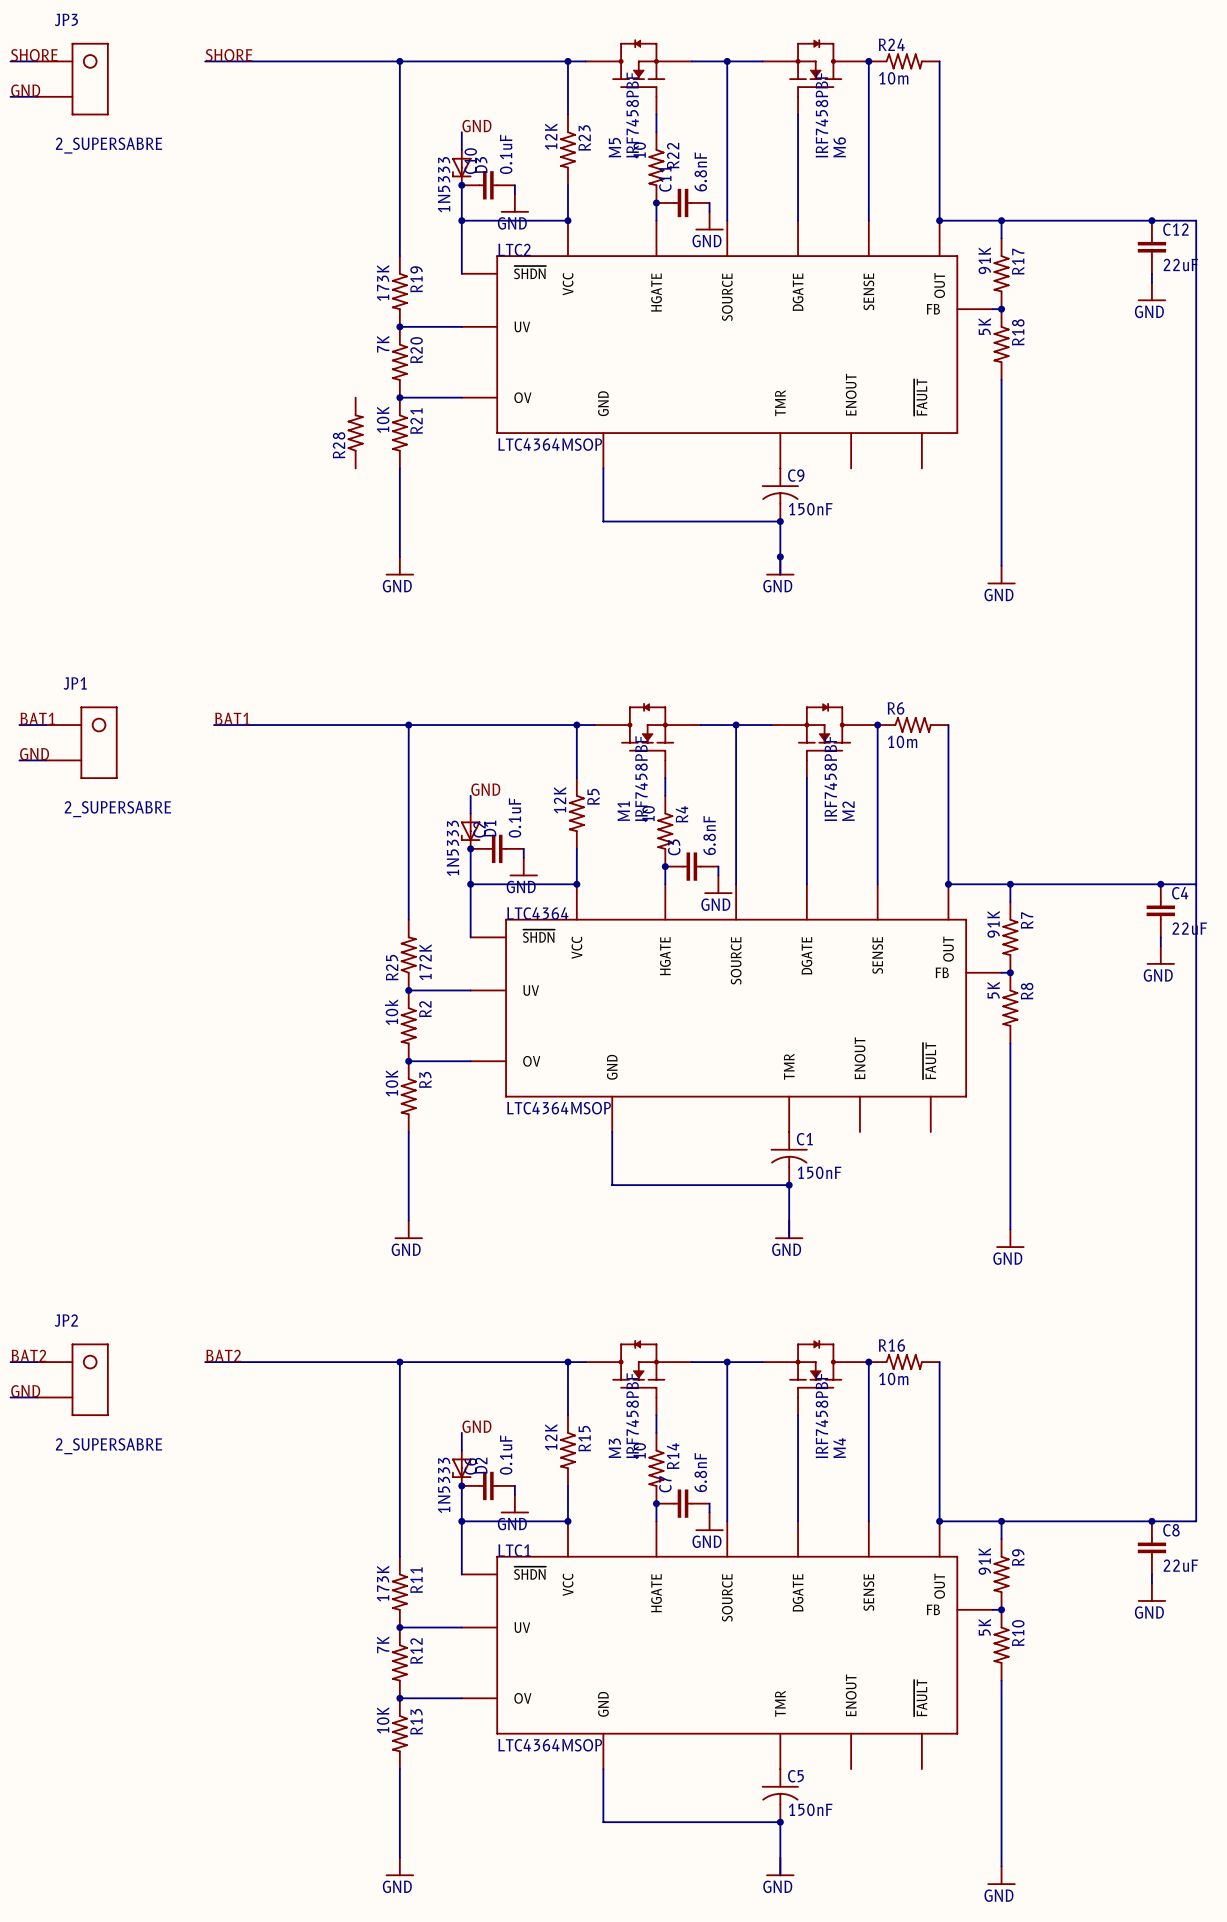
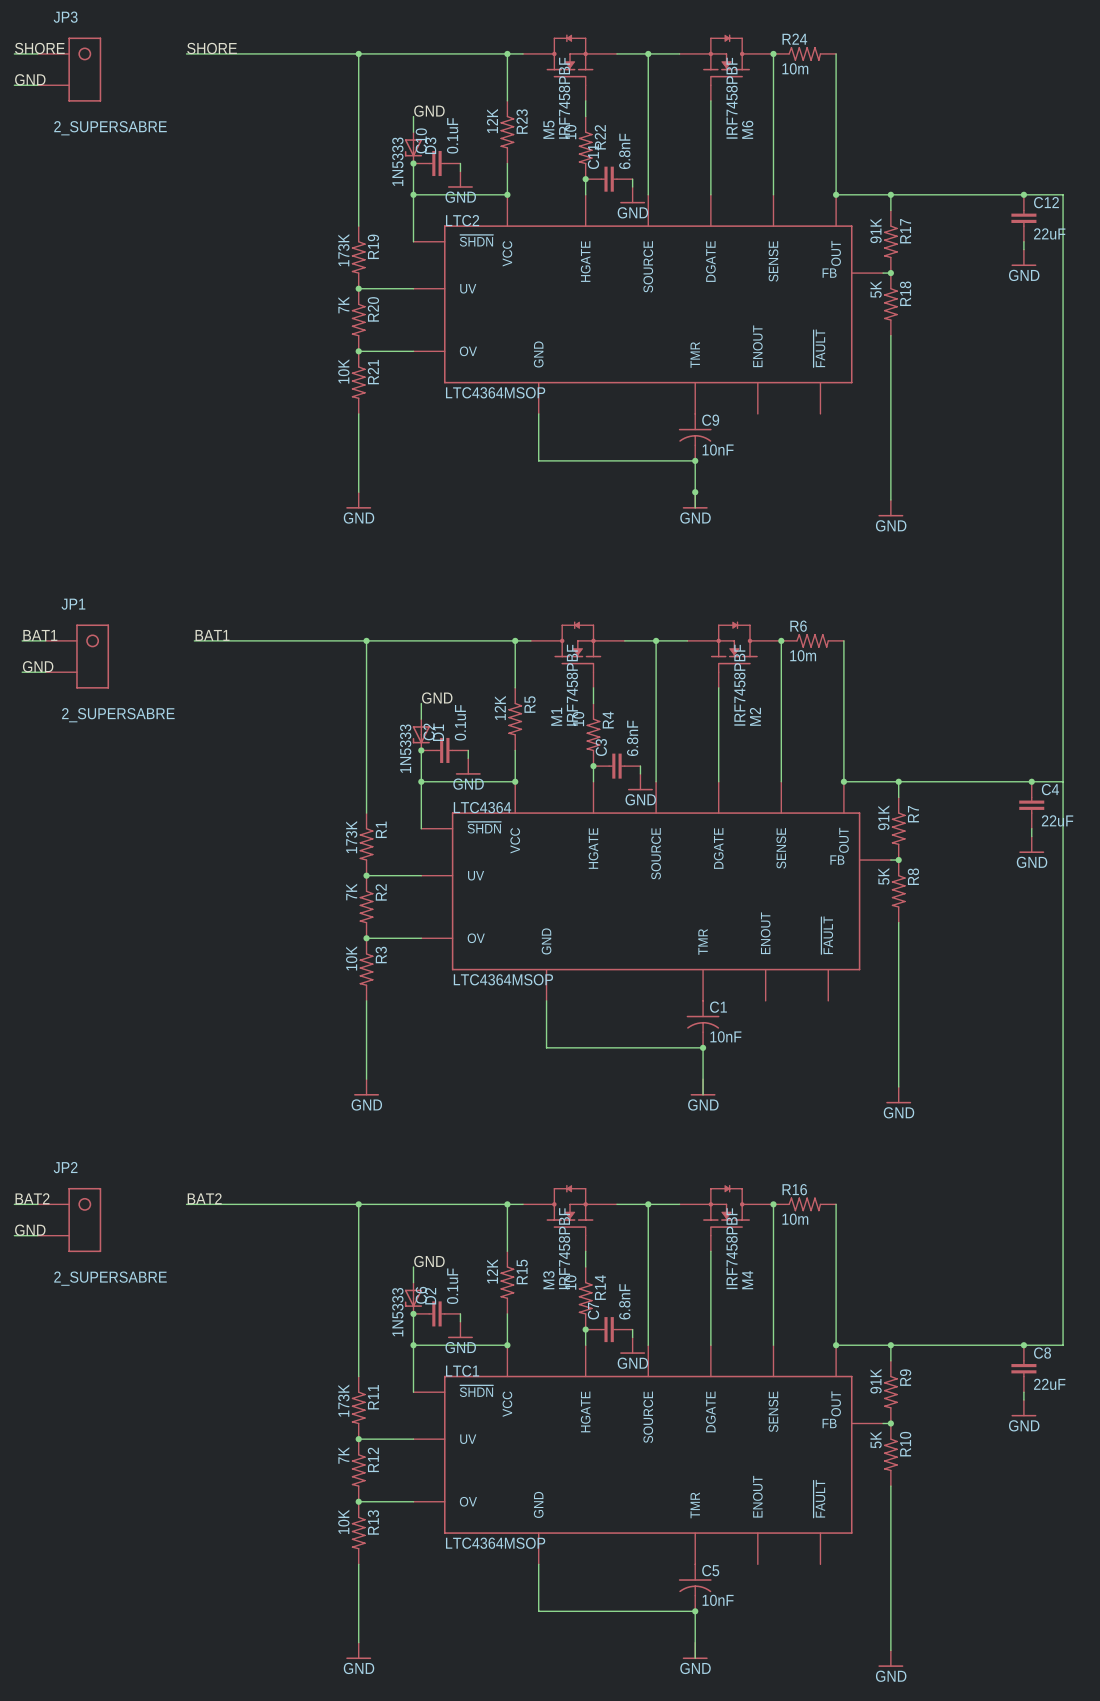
R28: (355, 433) -> none
C9 value: 150nF (810, 509) -> 10nF (718, 449)
R25: 172K (408, 955) -> none
R1: none -> 173K (366, 844)
R2 value: 10k (391, 1012) -> 7K (351, 891)
C1 value: 150nF (819, 1172) -> 10nF (725, 1036)
C5 value: 150nF (810, 1809) -> 10nF (718, 1600)

